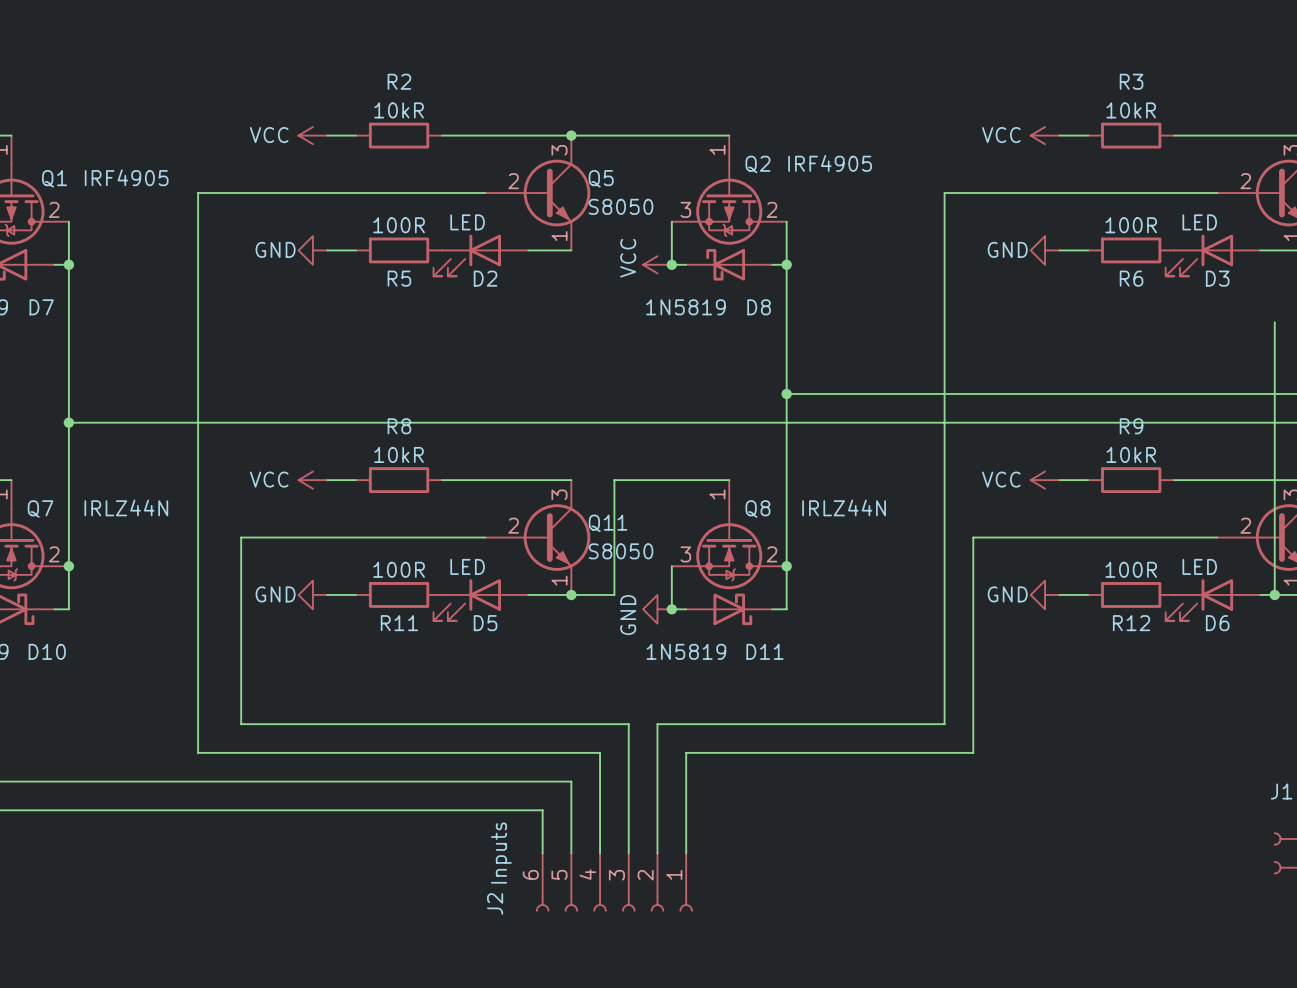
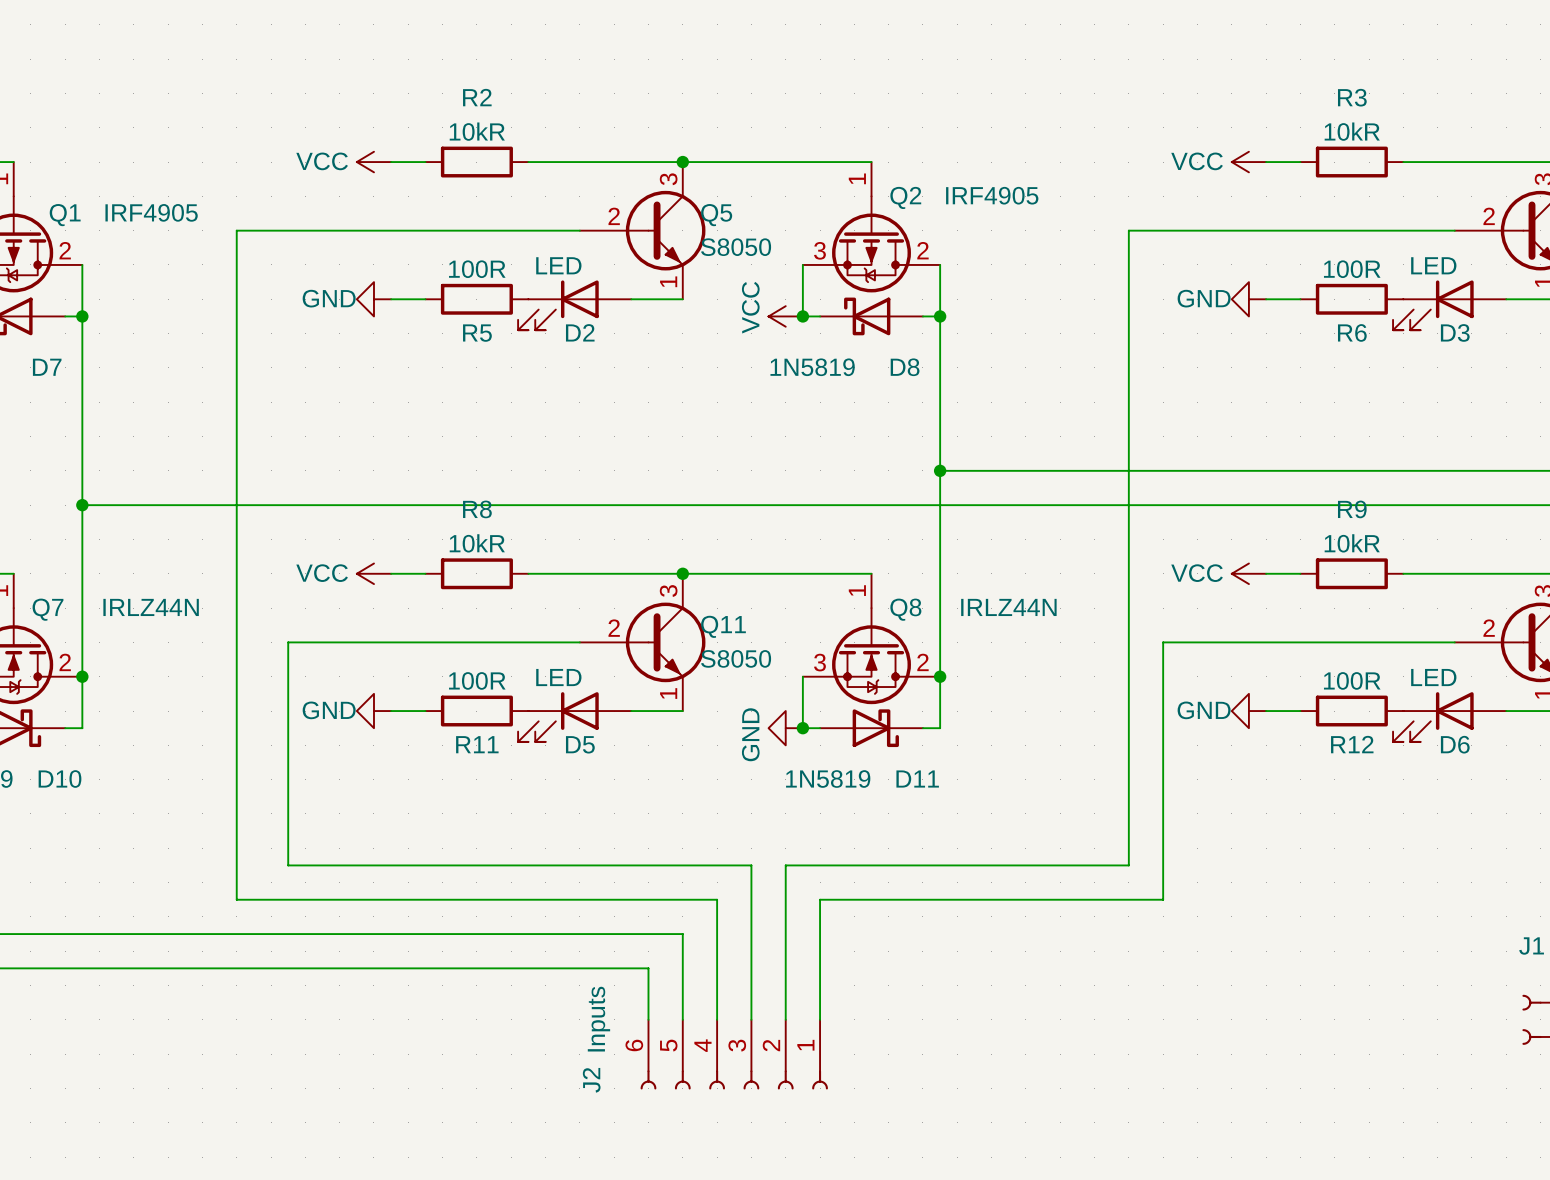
wire: (1274, 322) (1274, 594) -> none
junction: none -> (682, 573)
wire: (614, 480) (614, 594) (571, 594) -> (734, 573) (682, 573)
junction: (571, 594) -> none
junction: (1274, 594) -> none

